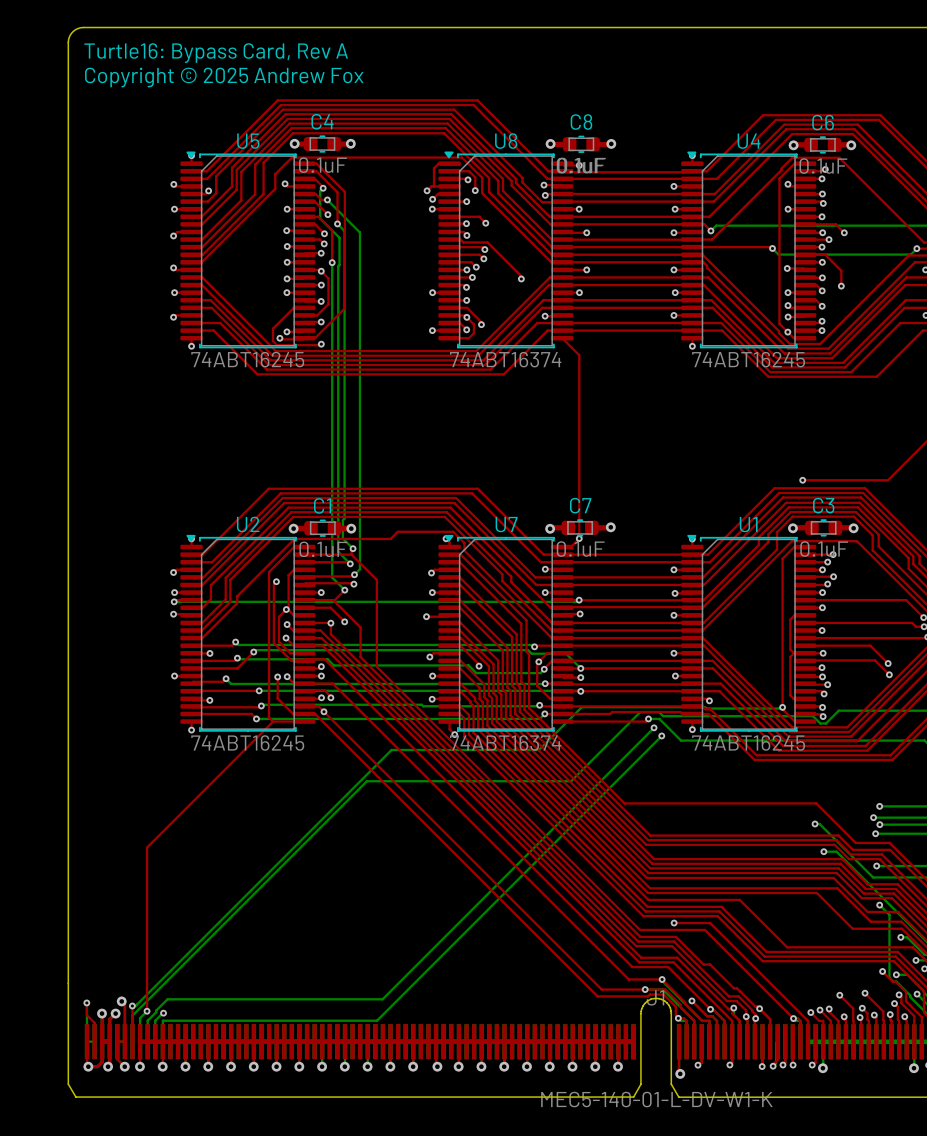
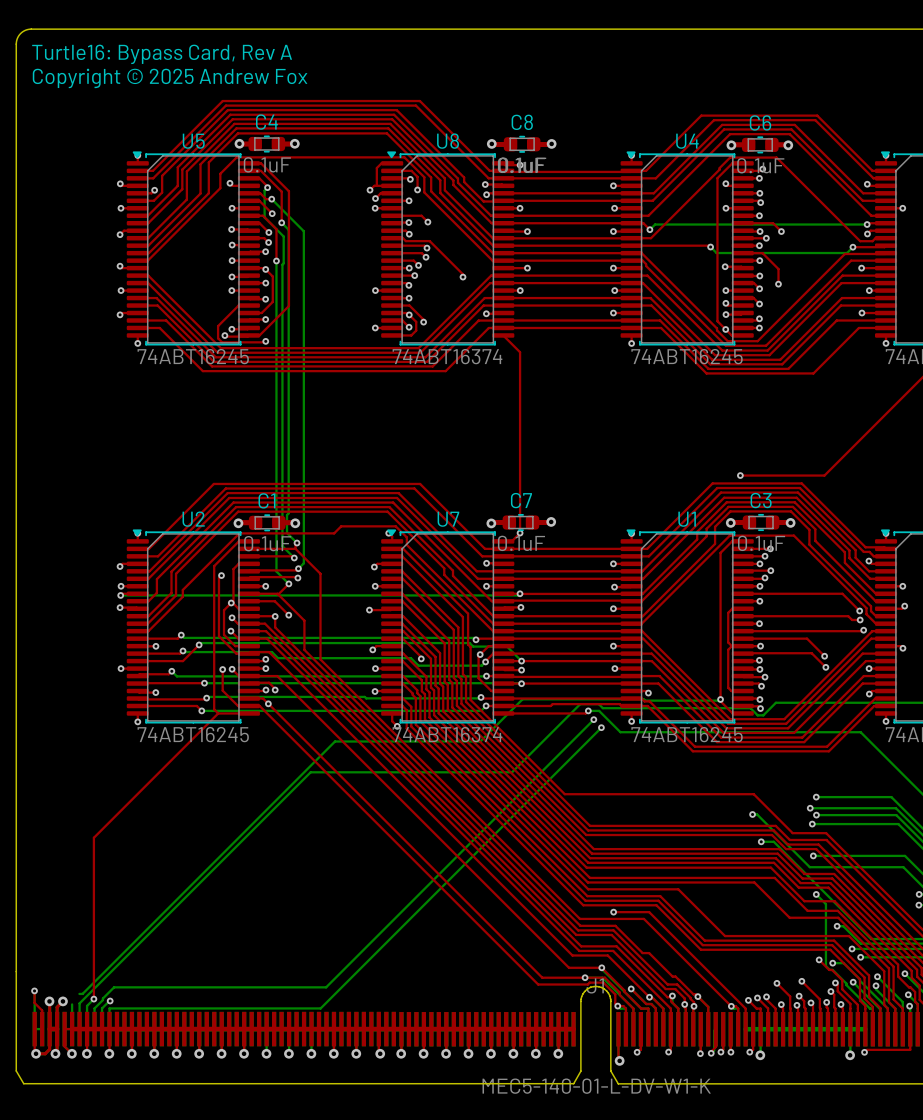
via: (121, 1001) -> none
top track: (123, 1001) (124, 1003) (124, 1041) -> (86, 1029) (72, 1029)
top track: (132, 1006) (132, 1041) -> none
via: (132, 1006) -> none

